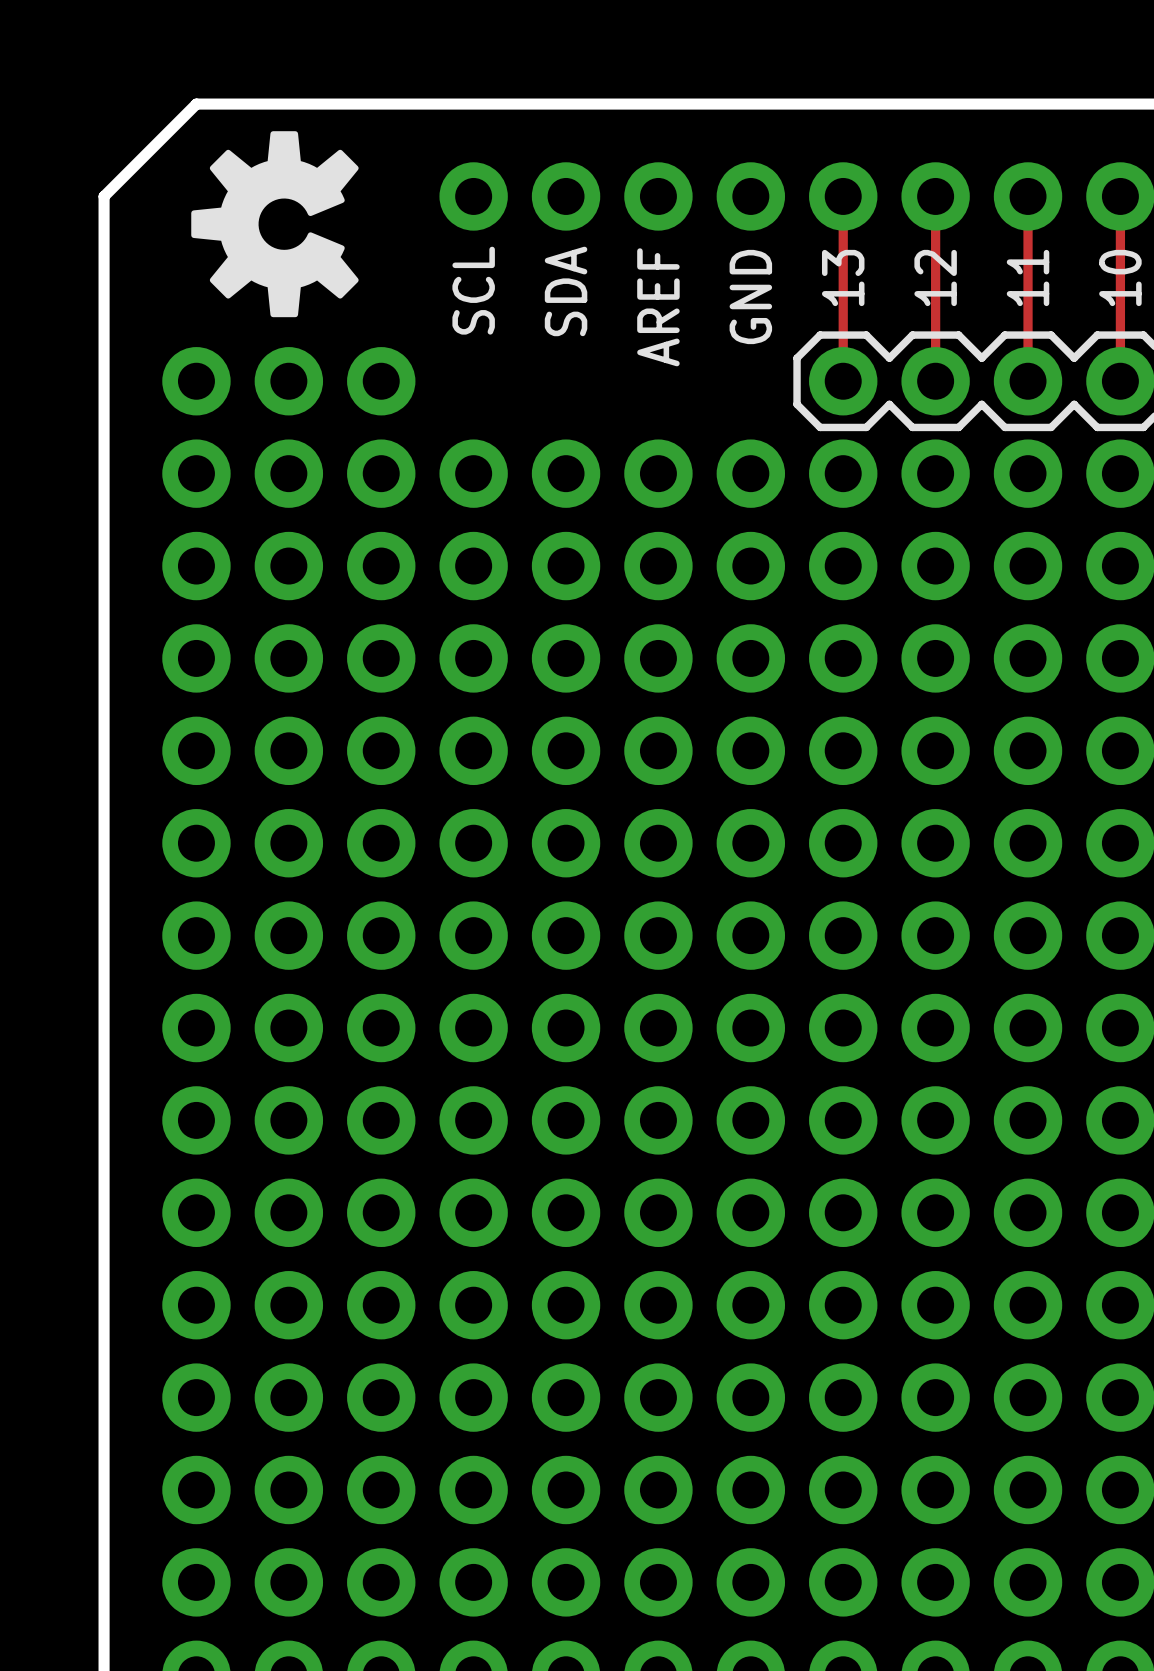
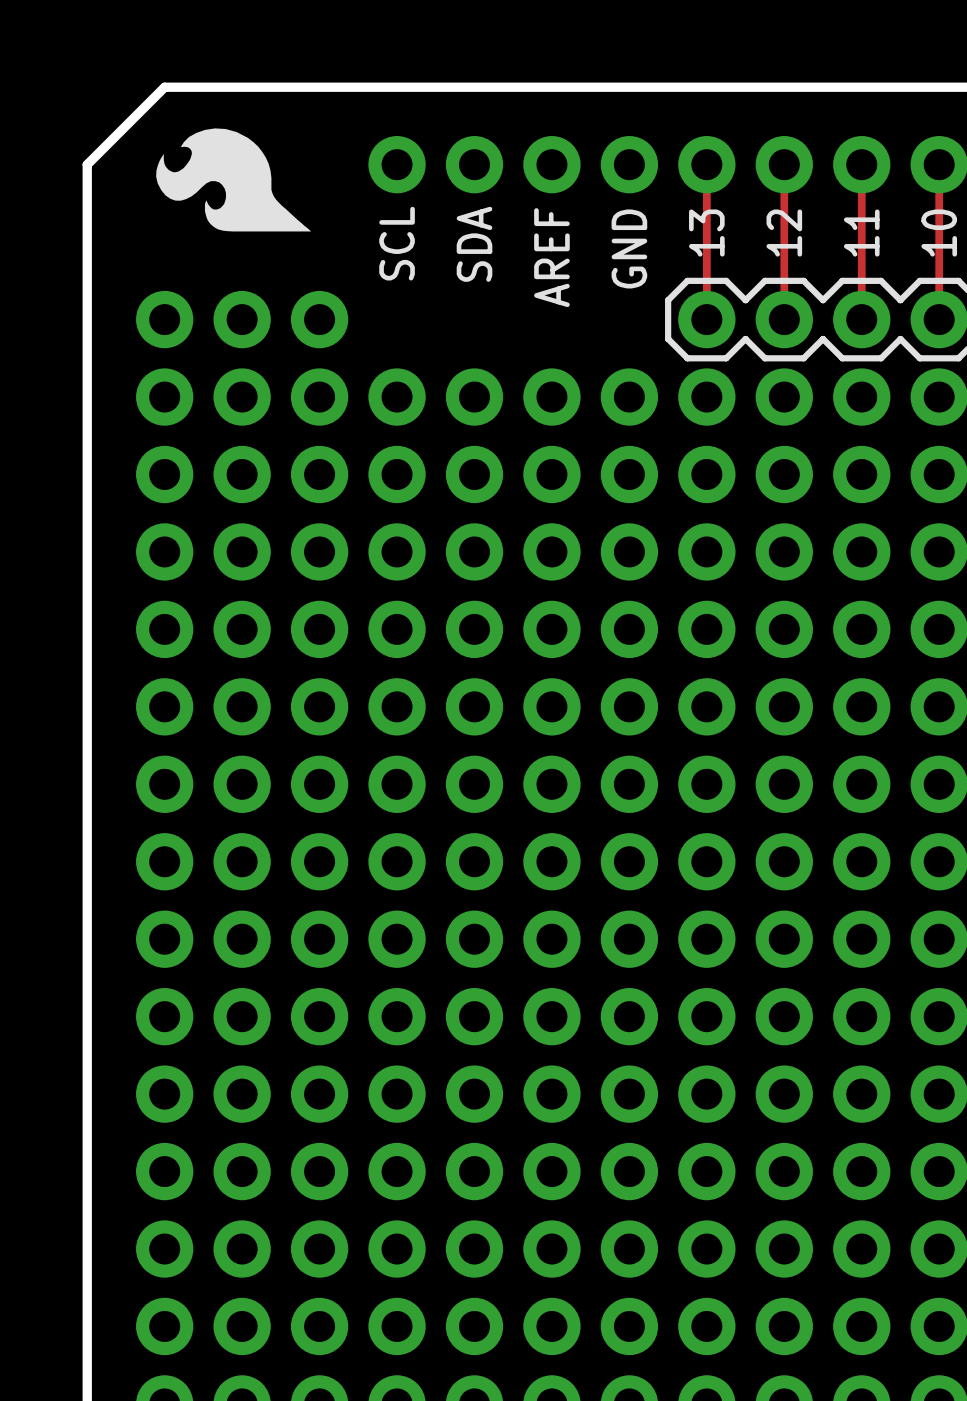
drawing shape: [191, 131, 359, 318] -> [156, 128, 312, 232]

